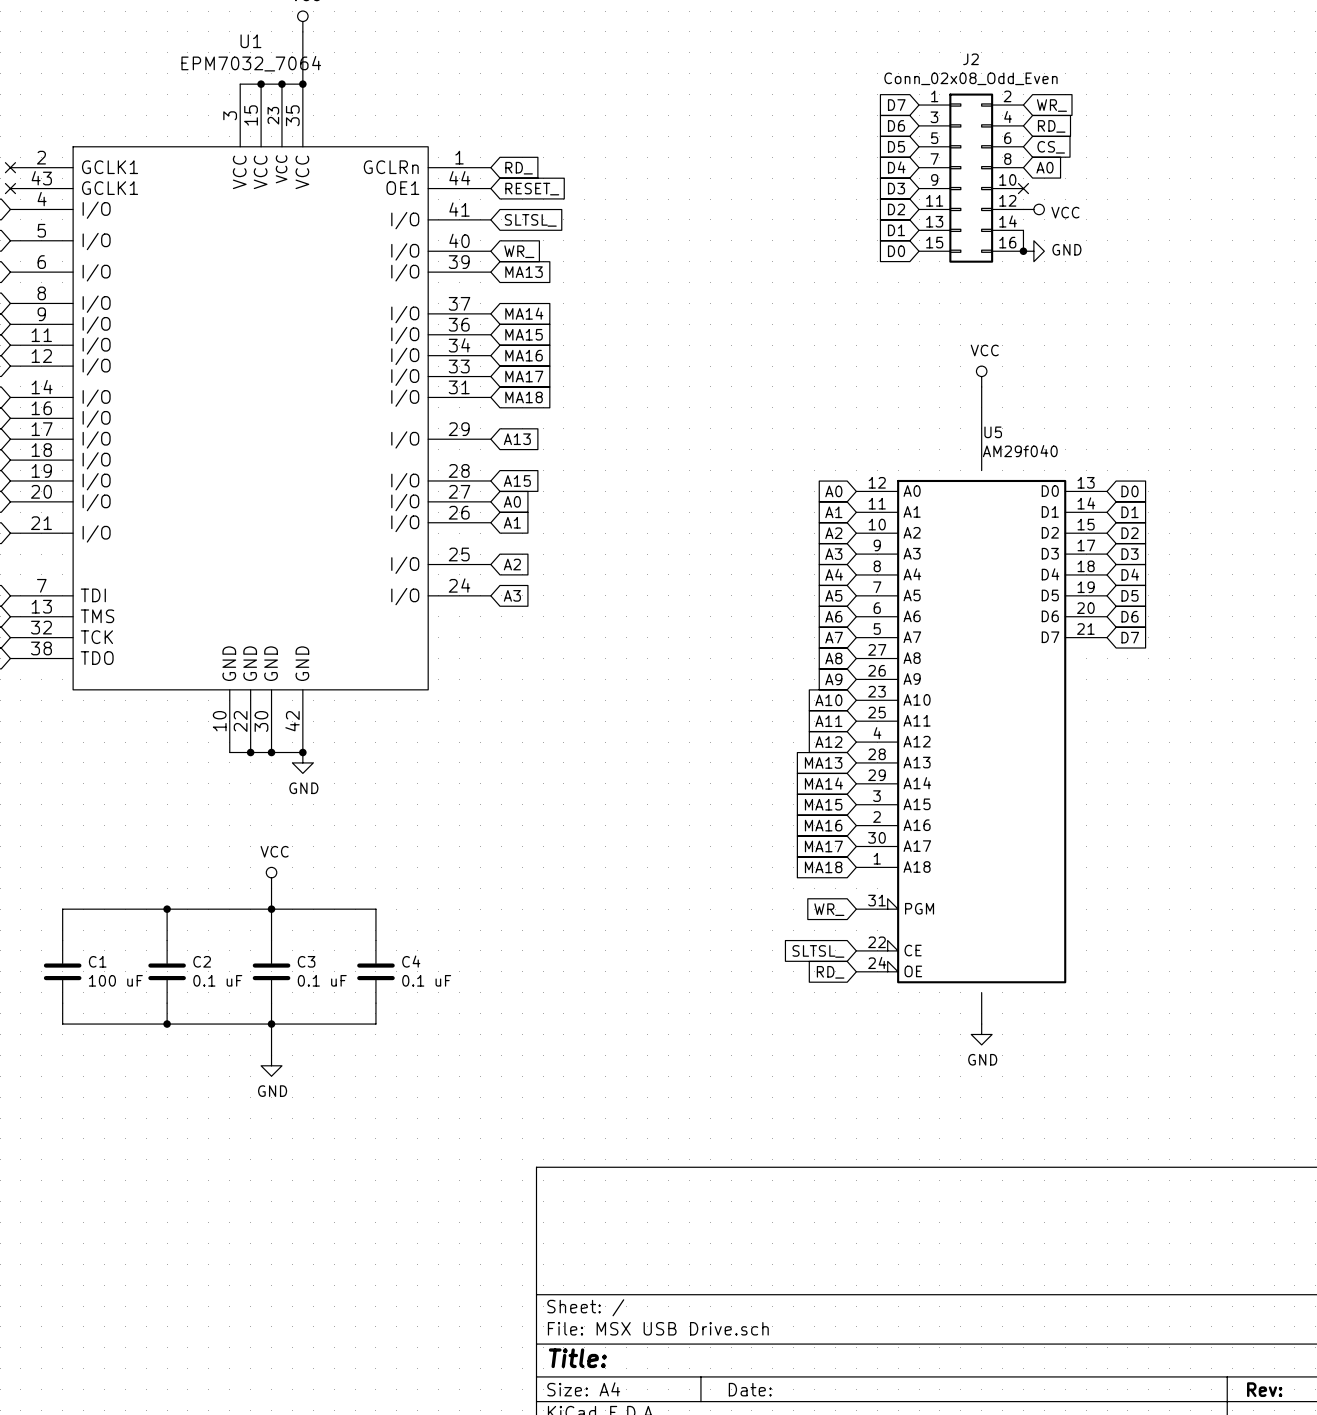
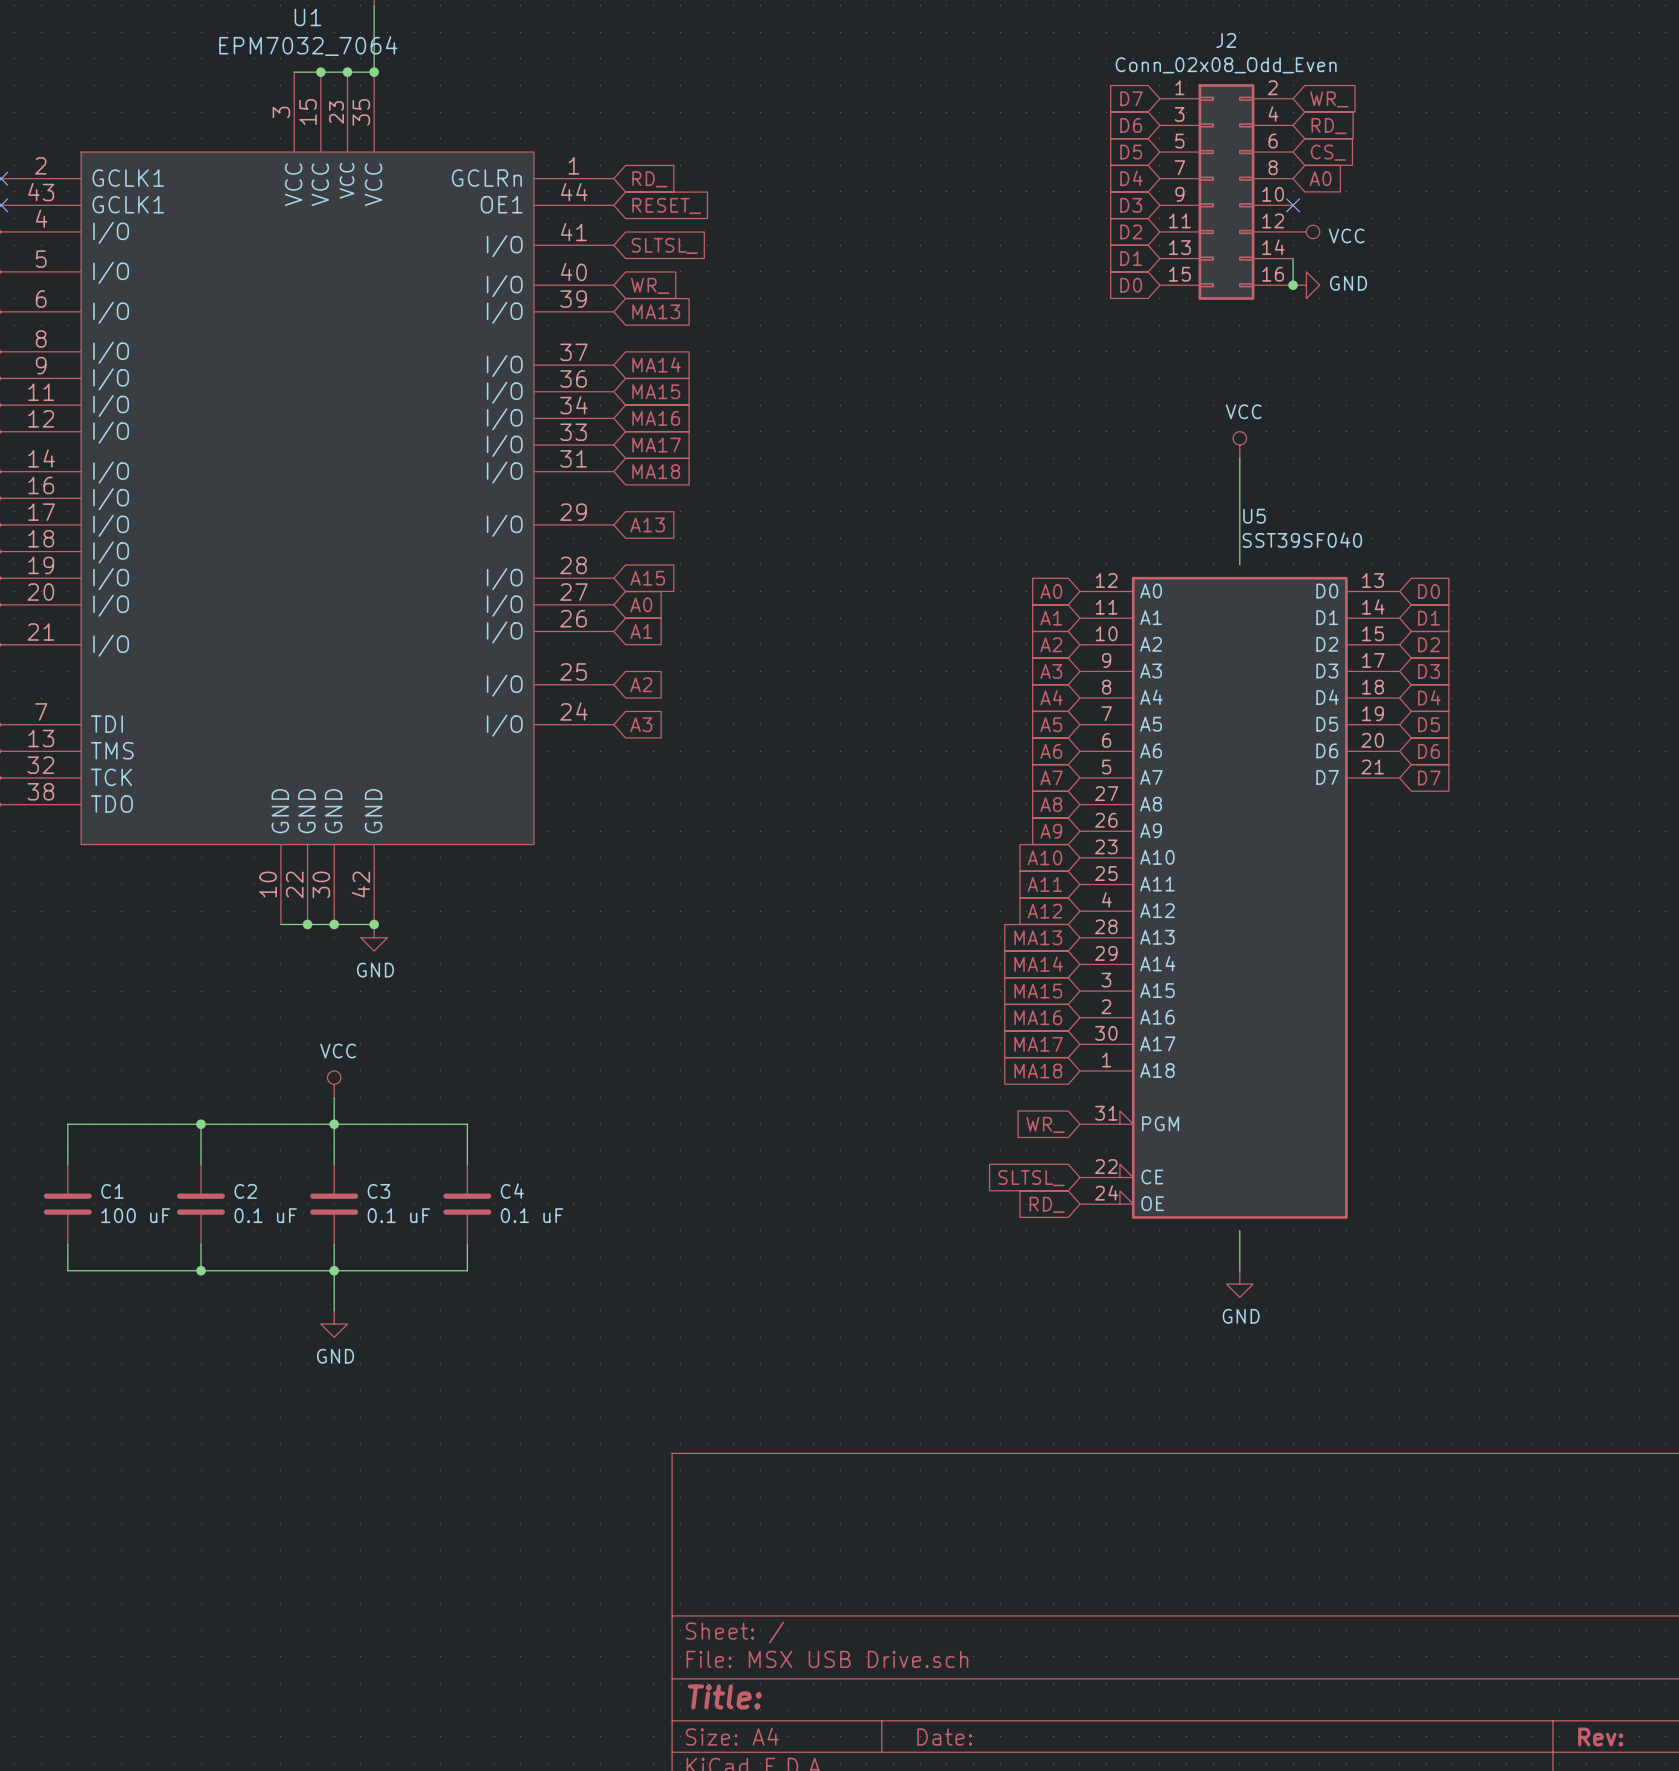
U5 value: AM29f040 (1020, 451) -> SST39SF040 (1302, 540)

